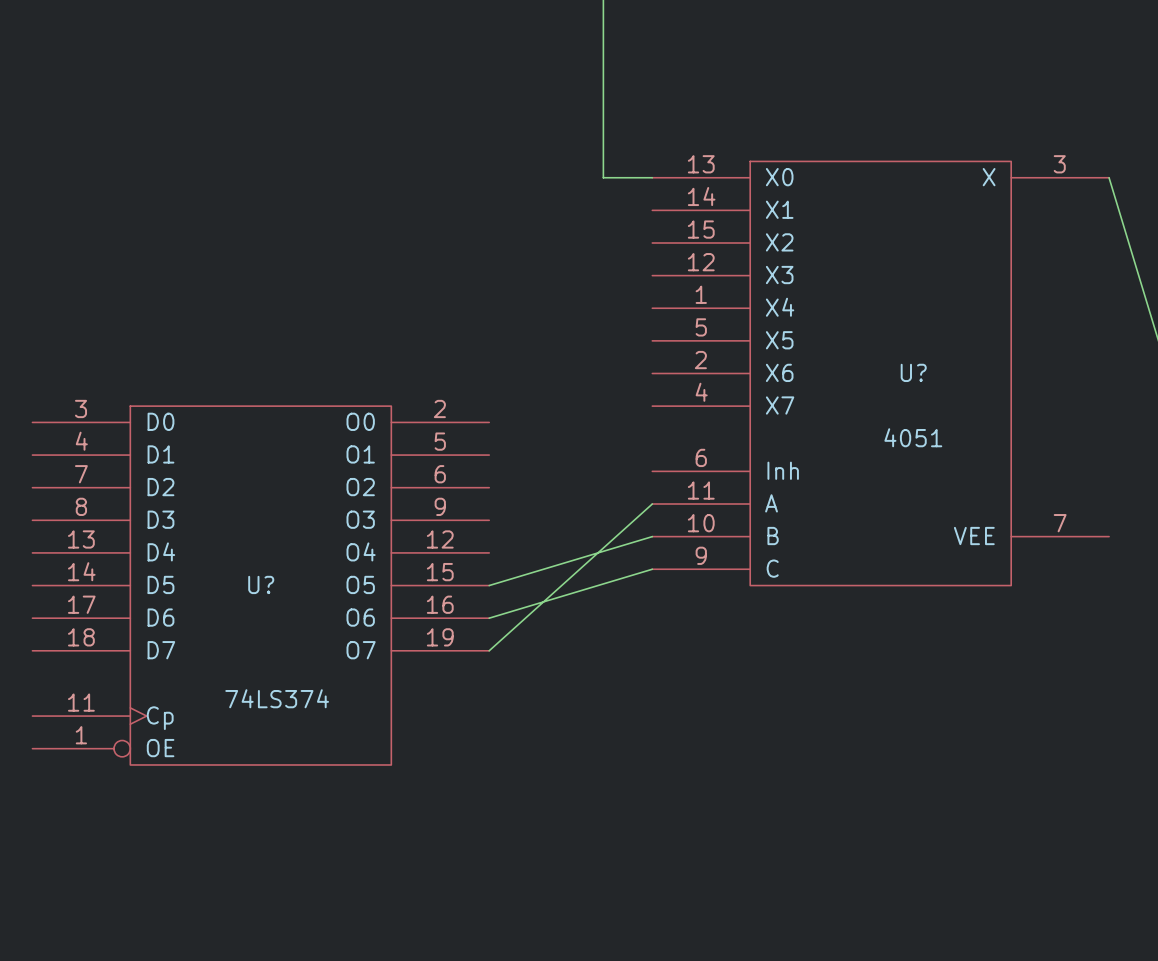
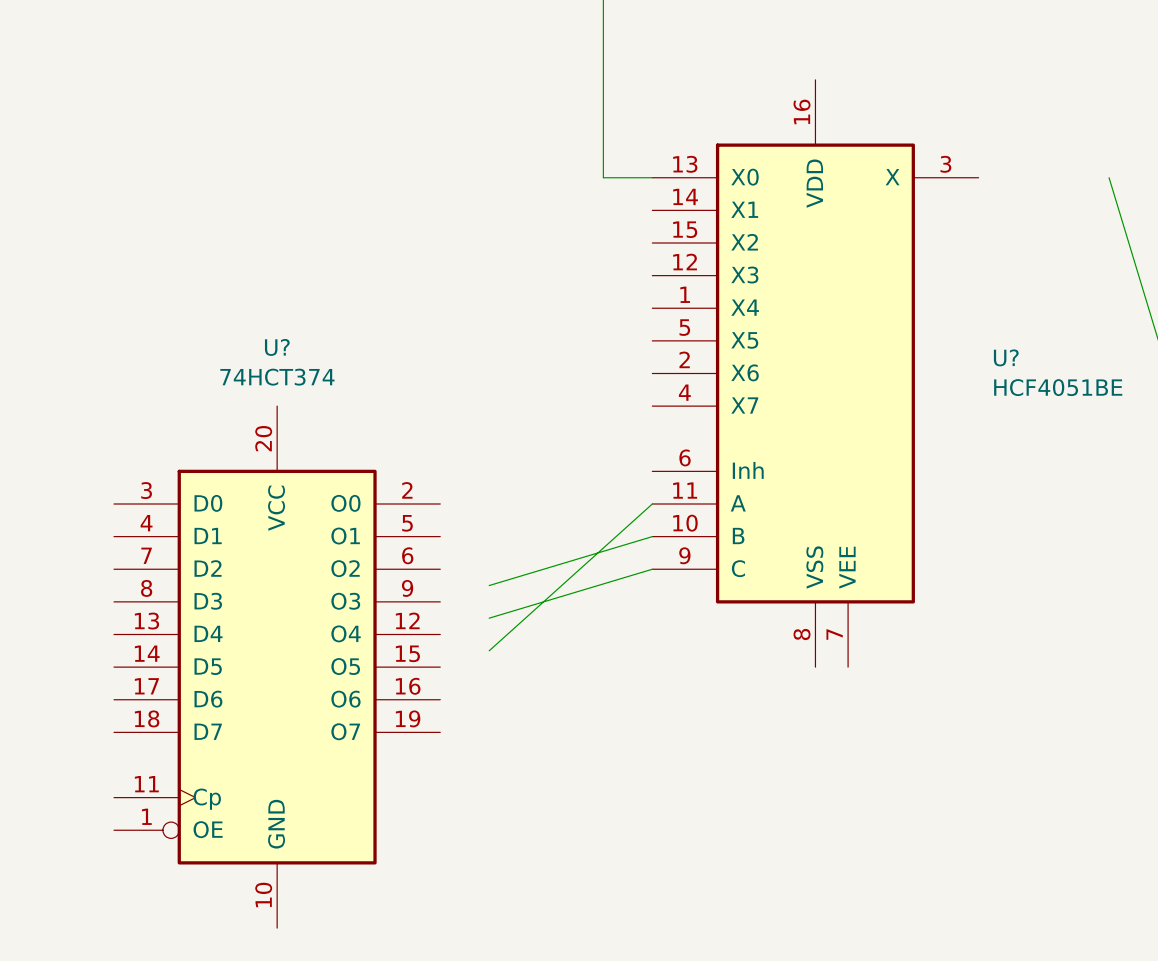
U?: none -> HCF4051BE (815, 373)
U?: 4051 (880, 373) -> none
U?: 74LS374 (260, 585) -> none
U?: none -> 74HCT374 (277, 667)

